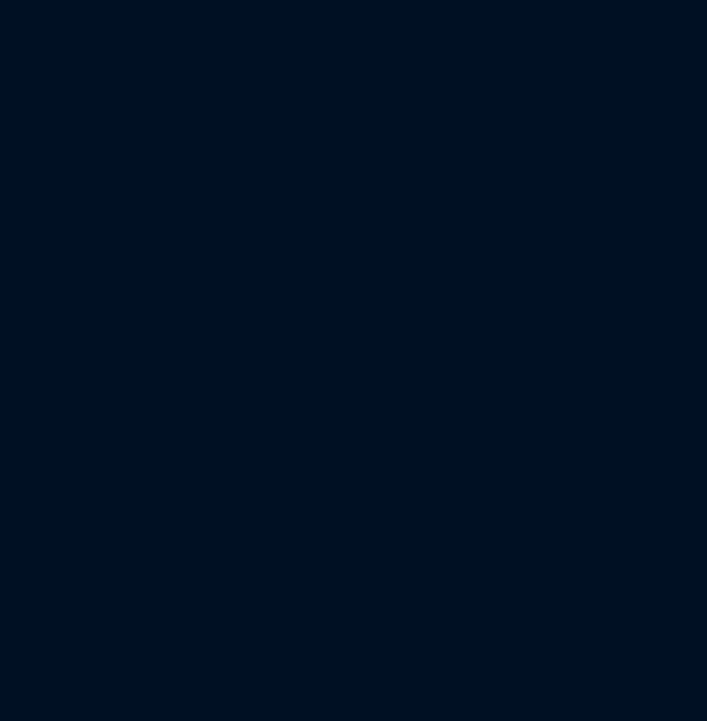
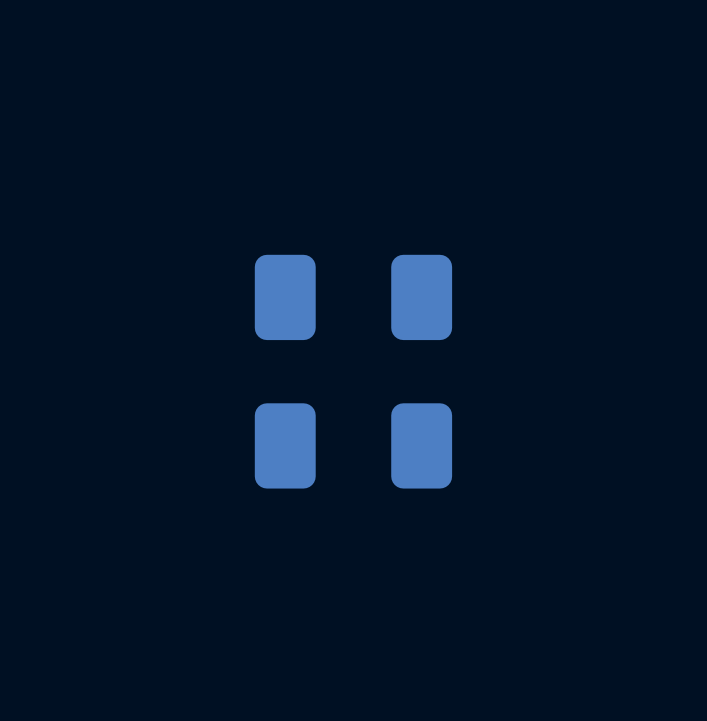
part: none -> (353, 297)
part: none -> (353, 445)

